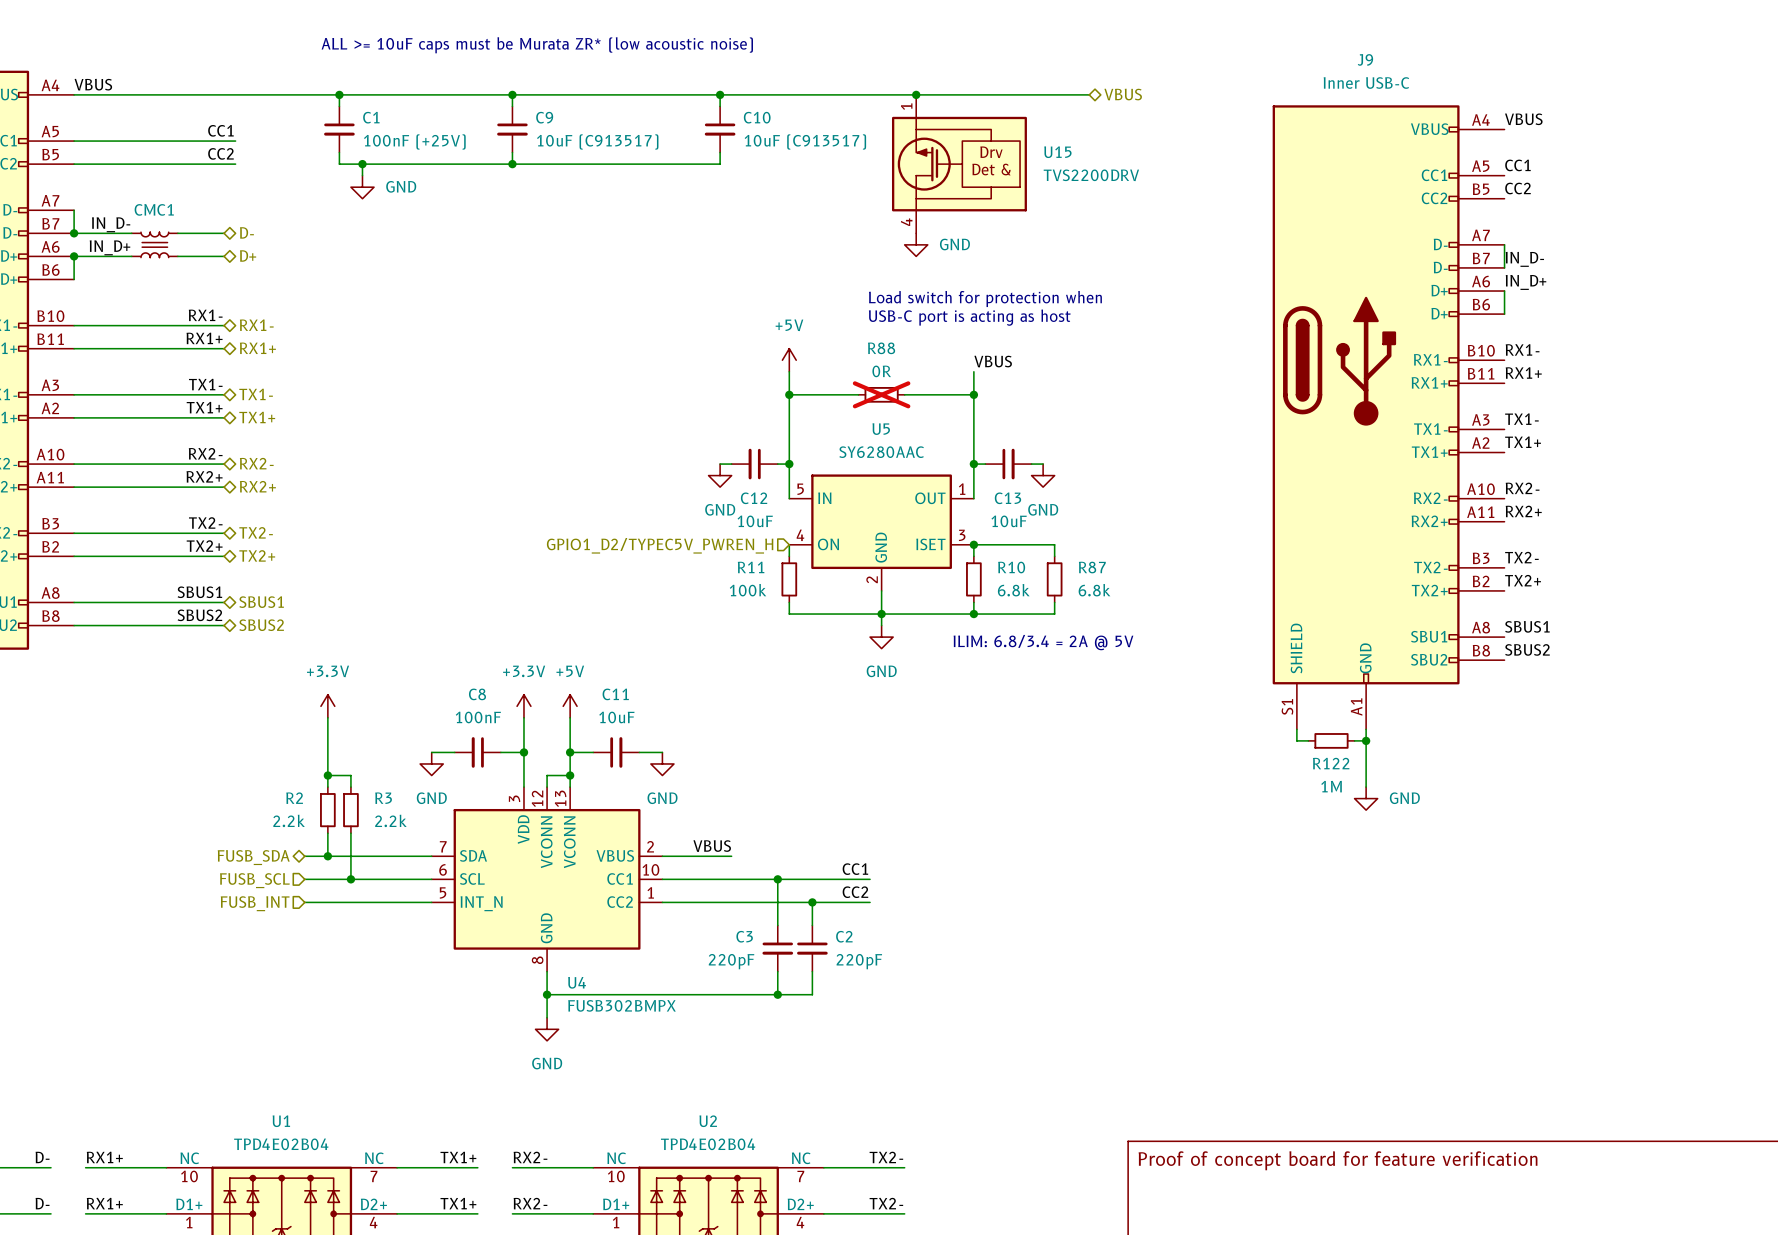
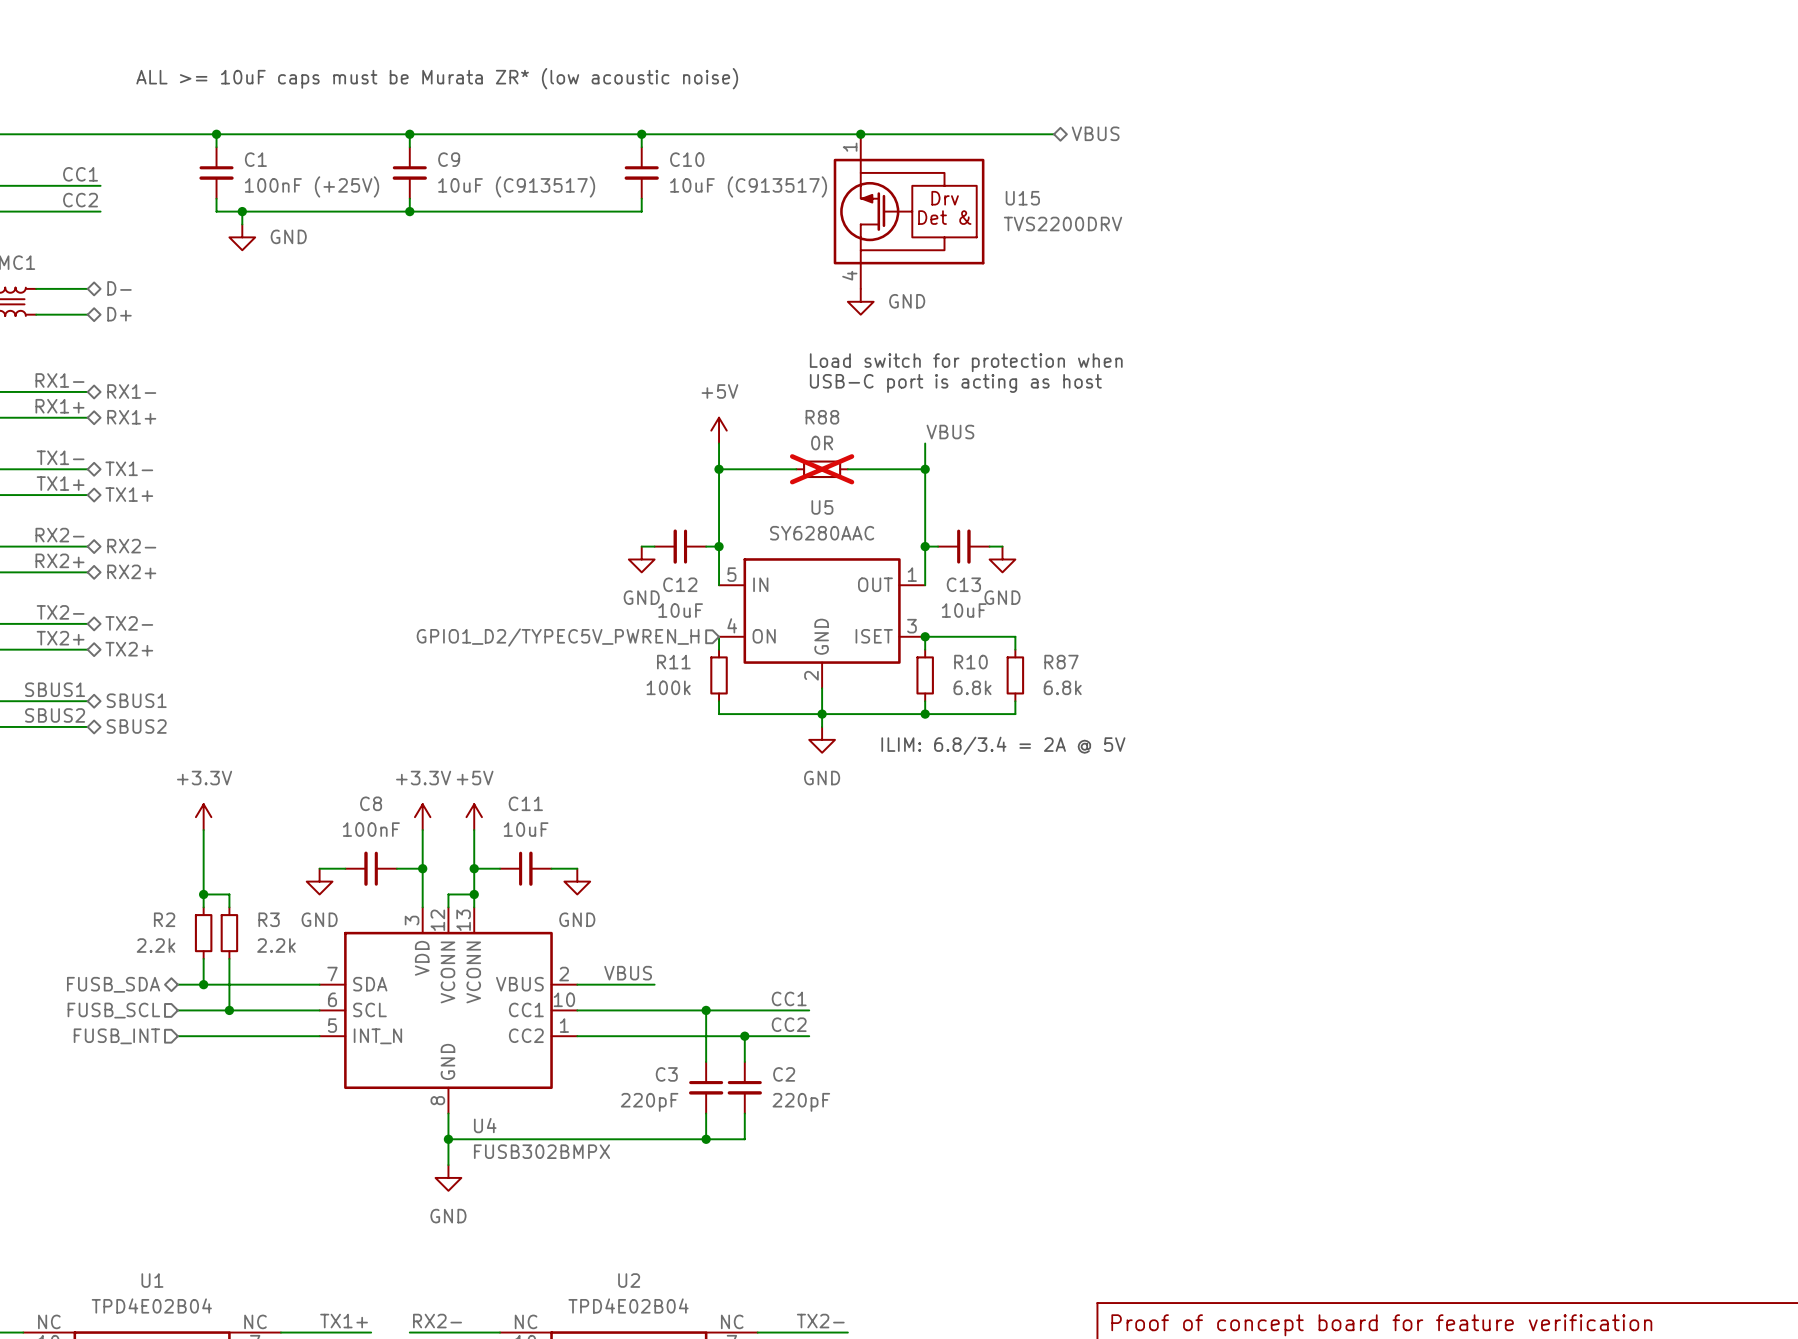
label: VBUS (1523, 119) -> none
label: CC1 (1517, 165) -> none
label: CC2 (1517, 188) -> none
wire: (1504, 244) (1504, 267) -> none
label: IN_D- (1524, 259) -> none
label: IN_D+ (1526, 282) -> none
wire: (1504, 291) (1504, 314) -> none
label: RX1- (1522, 349) -> none
label: RX1+ (1523, 373) -> none
J9: Inner USB-C (1388, 417) -> none
label: TX1- (1521, 419) -> none
label: TX1+ (1523, 442) -> none
label: RX2- (1522, 488) -> none
label: RX2+ (1523, 511) -> none
label: TX2- (1521, 557) -> none
label: TX2+ (1523, 580) -> none
label: SBUS1 (1527, 626) -> none
label: SBUS2 (1527, 649) -> none
wire: (1296, 729) (1296, 740) (1308, 740) -> none
wire: (1366, 729) (1366, 787) -> none
R122: 1M (1331, 740) -> none
wire: (1354, 740) (1366, 740) -> none
junction: (1366, 740) -> none
power symbol: GND (1366, 798) -> none

